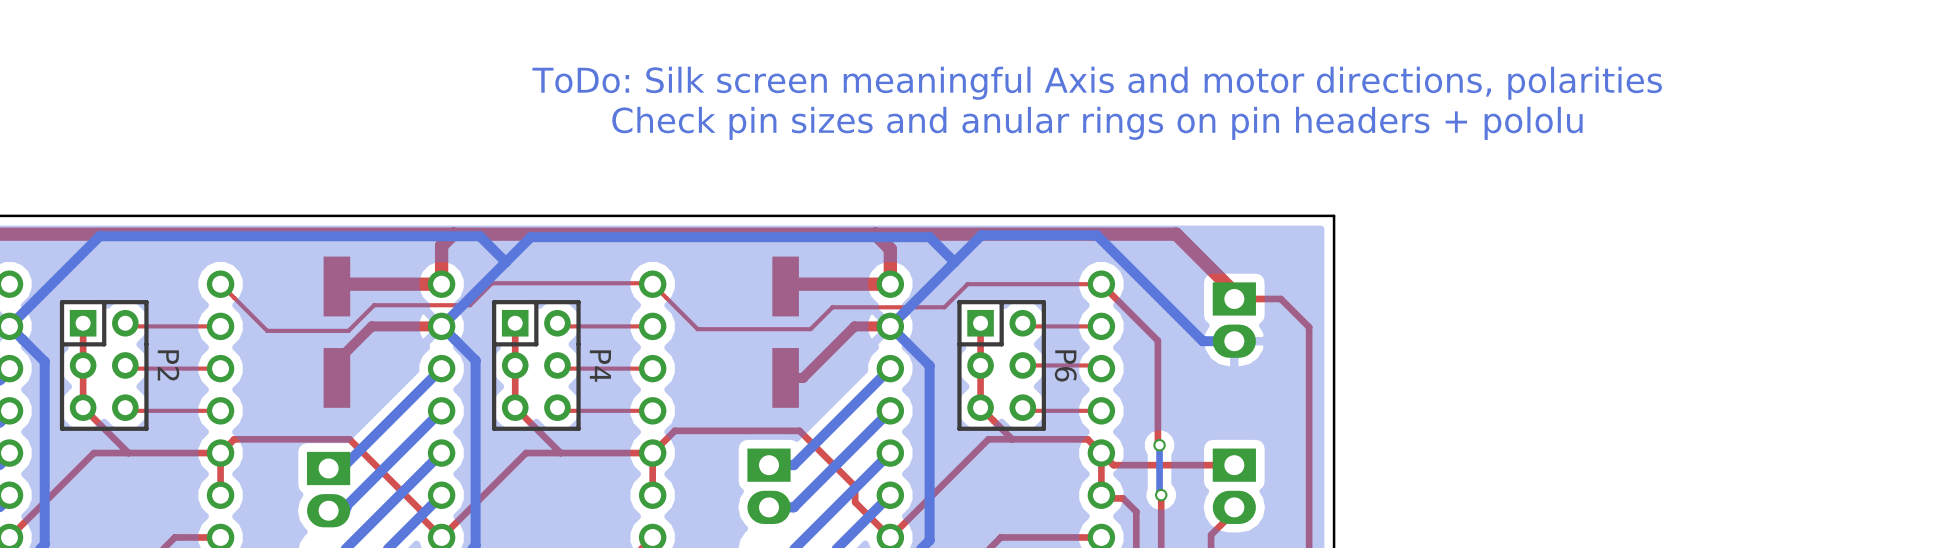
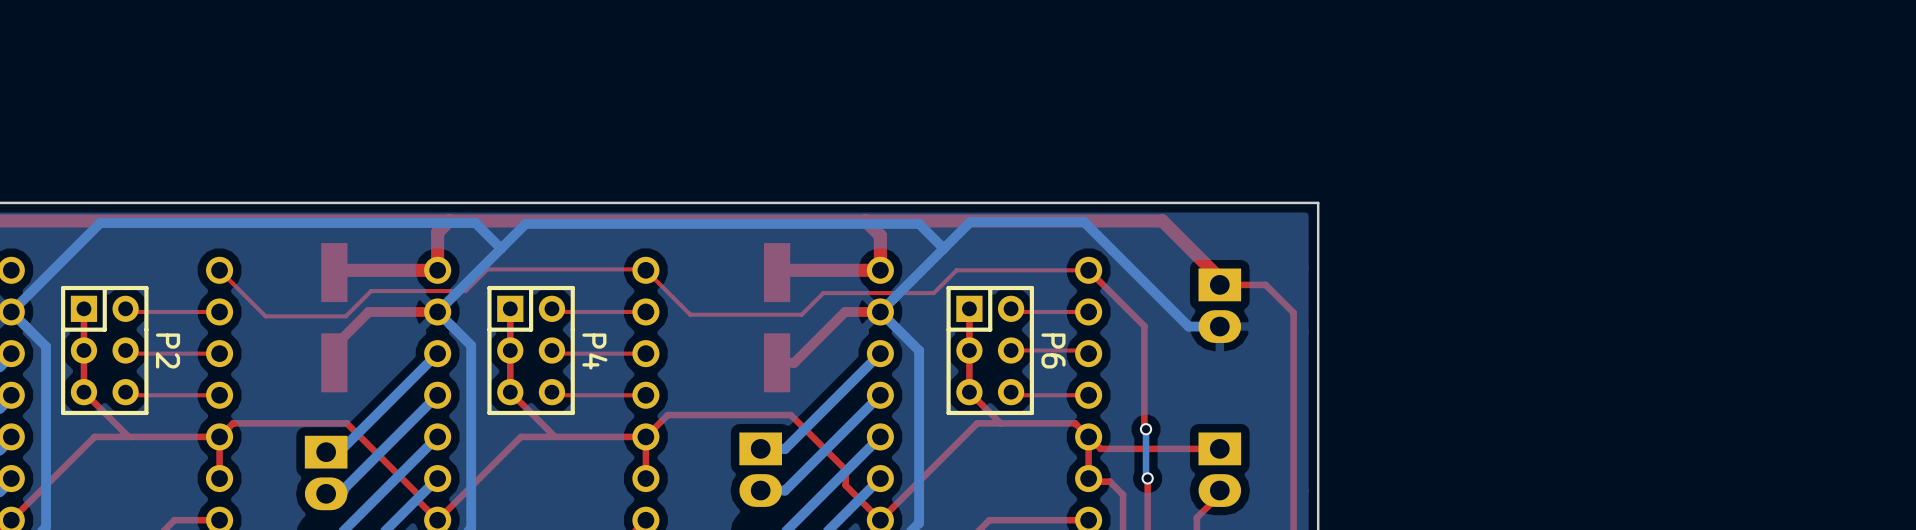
text: ToDo: Silk screen meaningful Axis and motor directions, polarities (1097, 83) -> none
text: Check pin sizes and anular rings on pin headers + pololu (1097, 123) -> none

